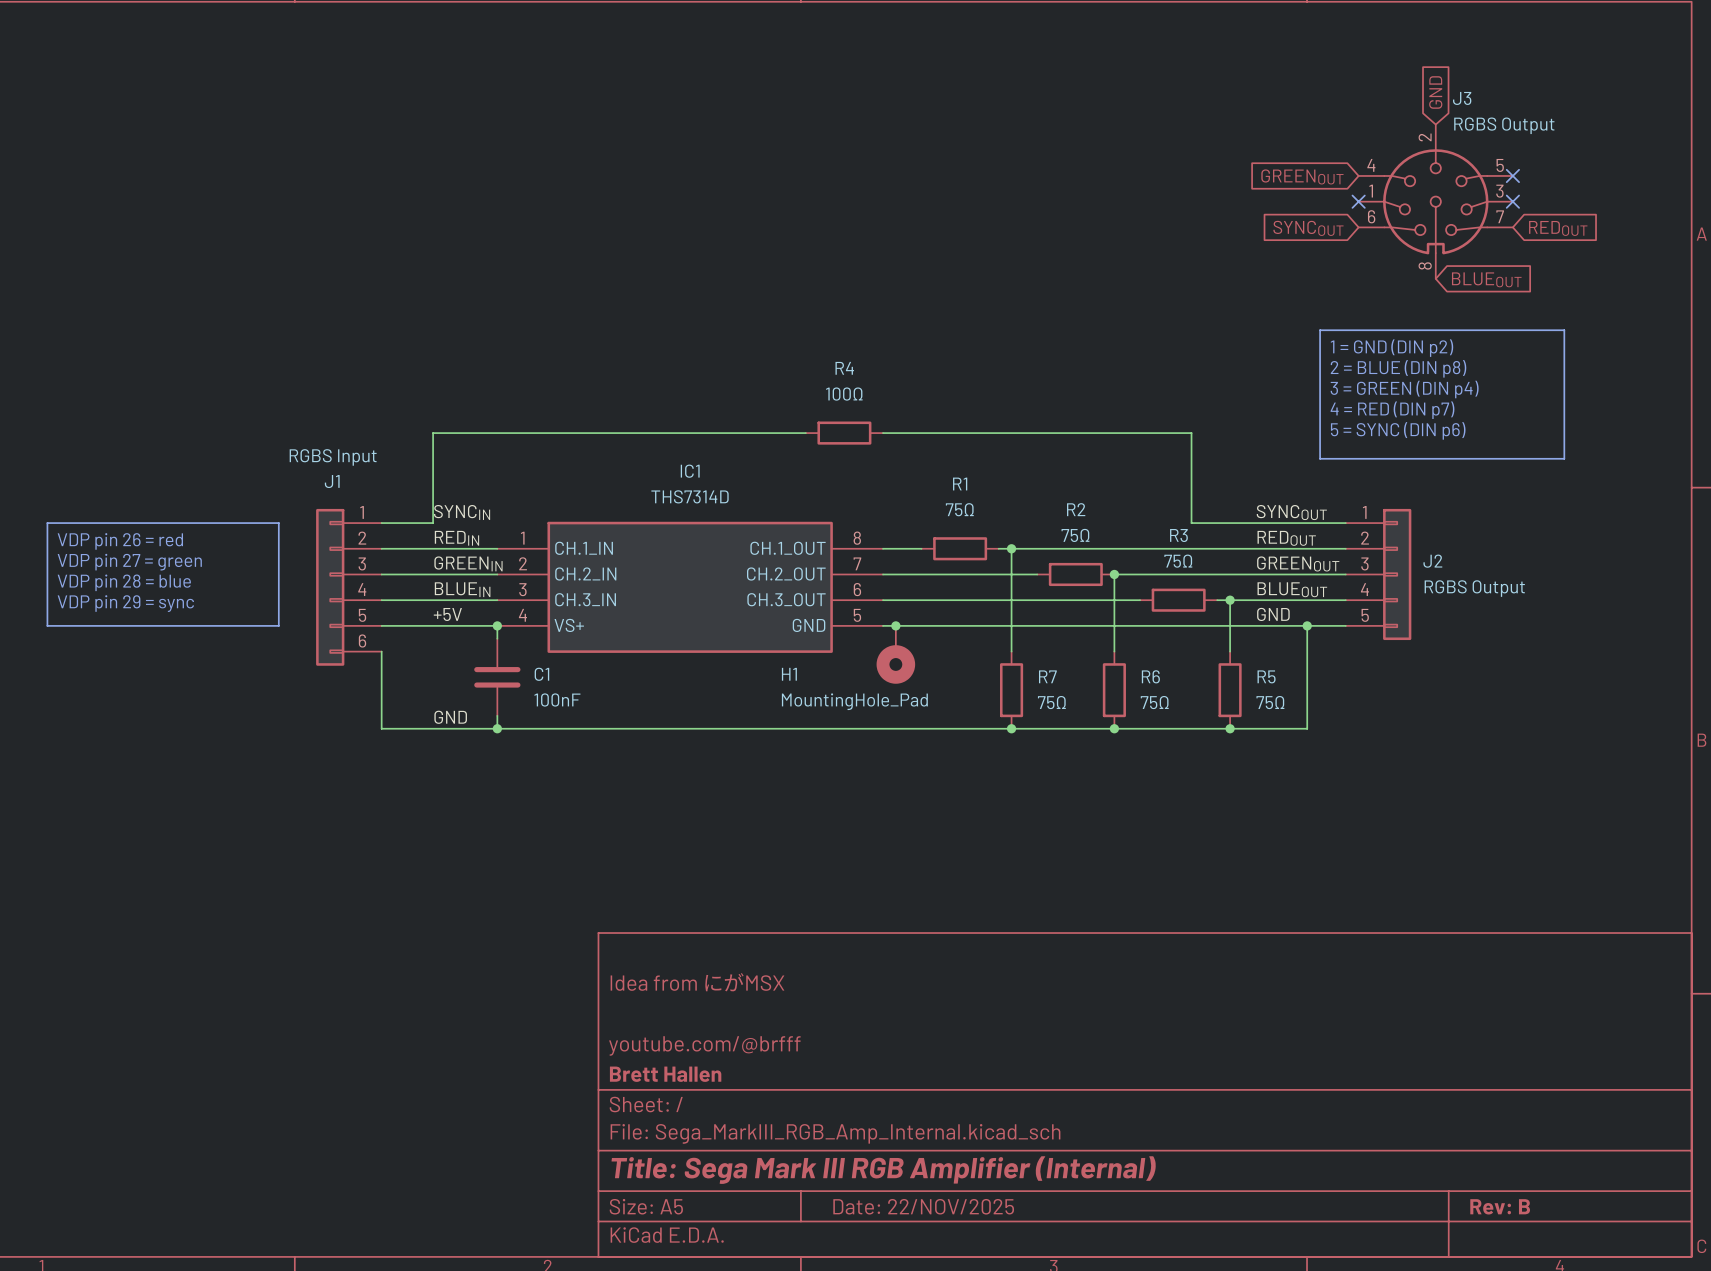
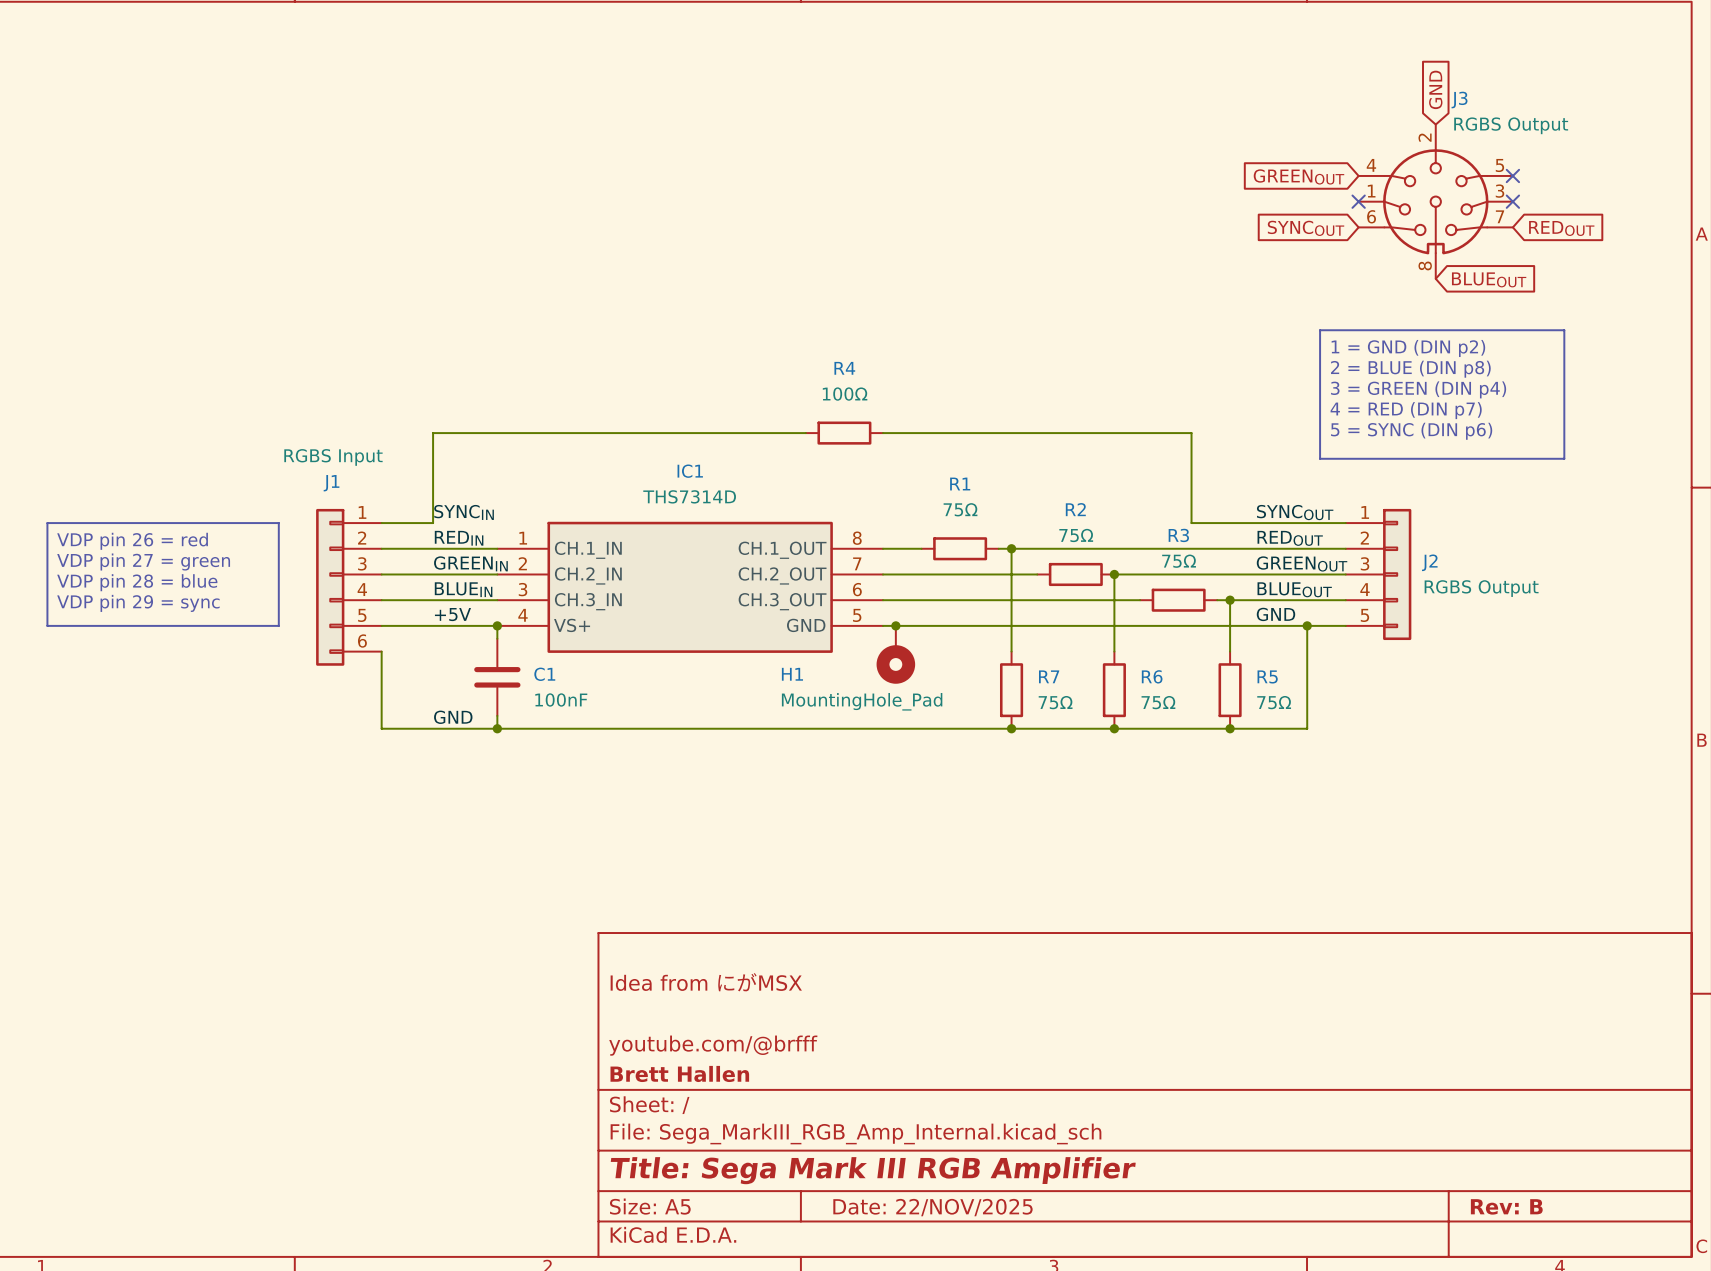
title block: Title: Sega Mark III RGB Amplifier (Internal) (883, 1170) -> Title: Sega Mark III RGB Amplifier (873, 1170)

